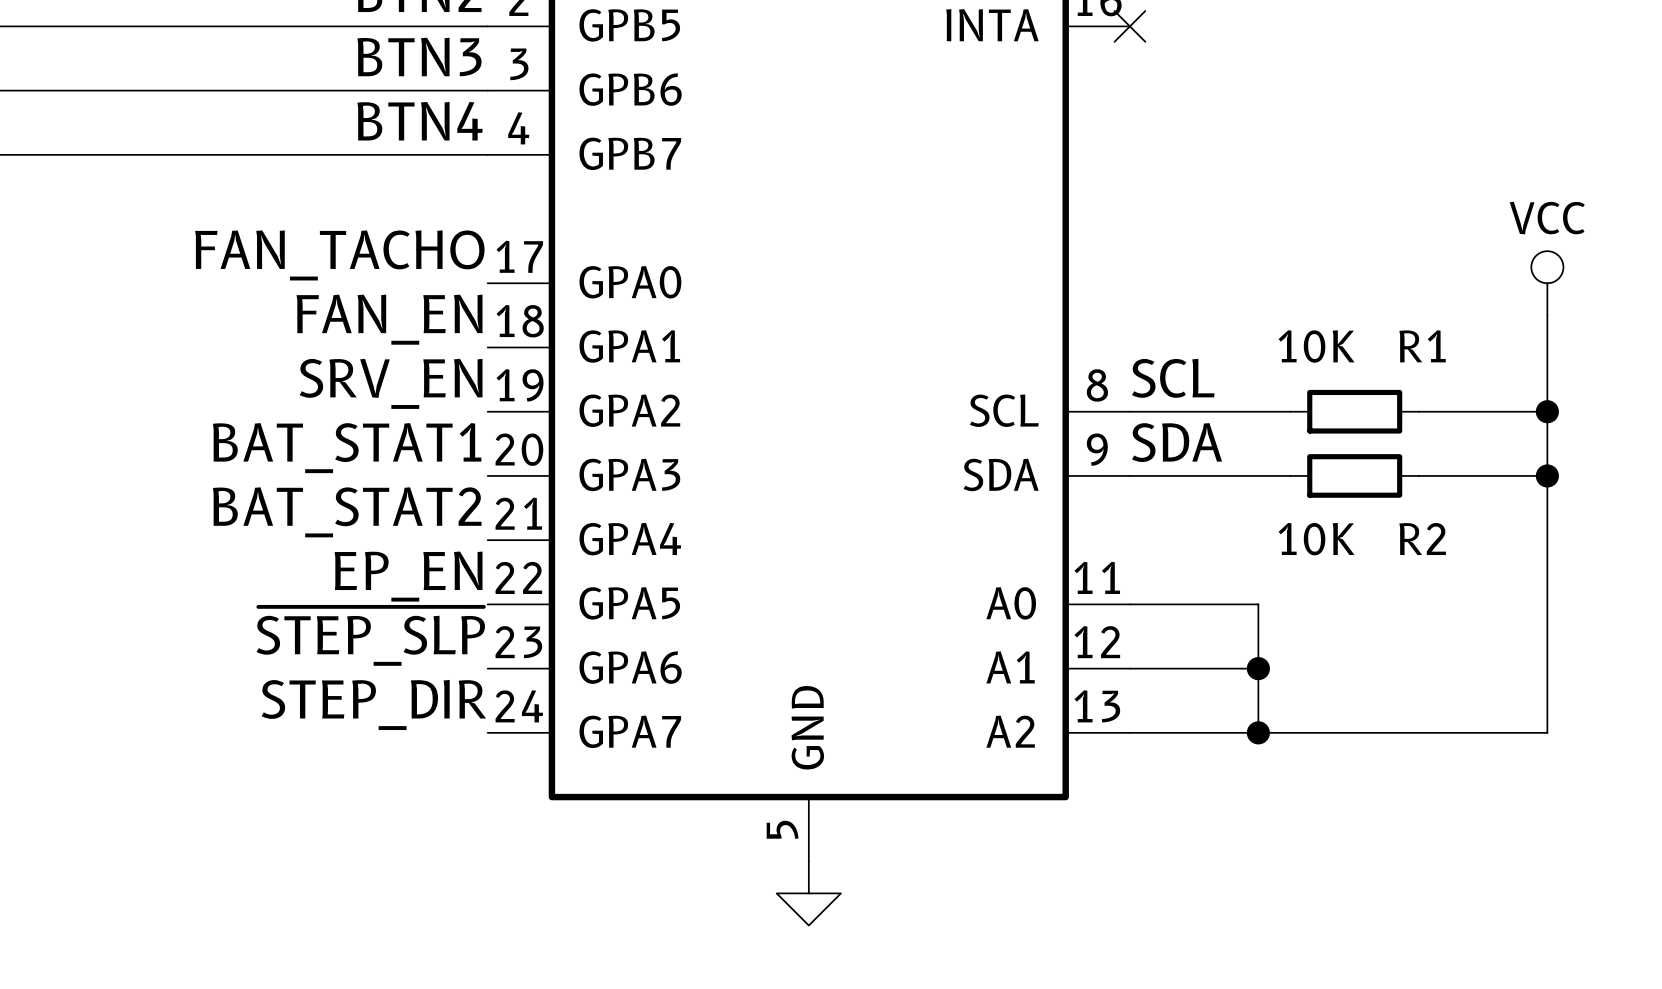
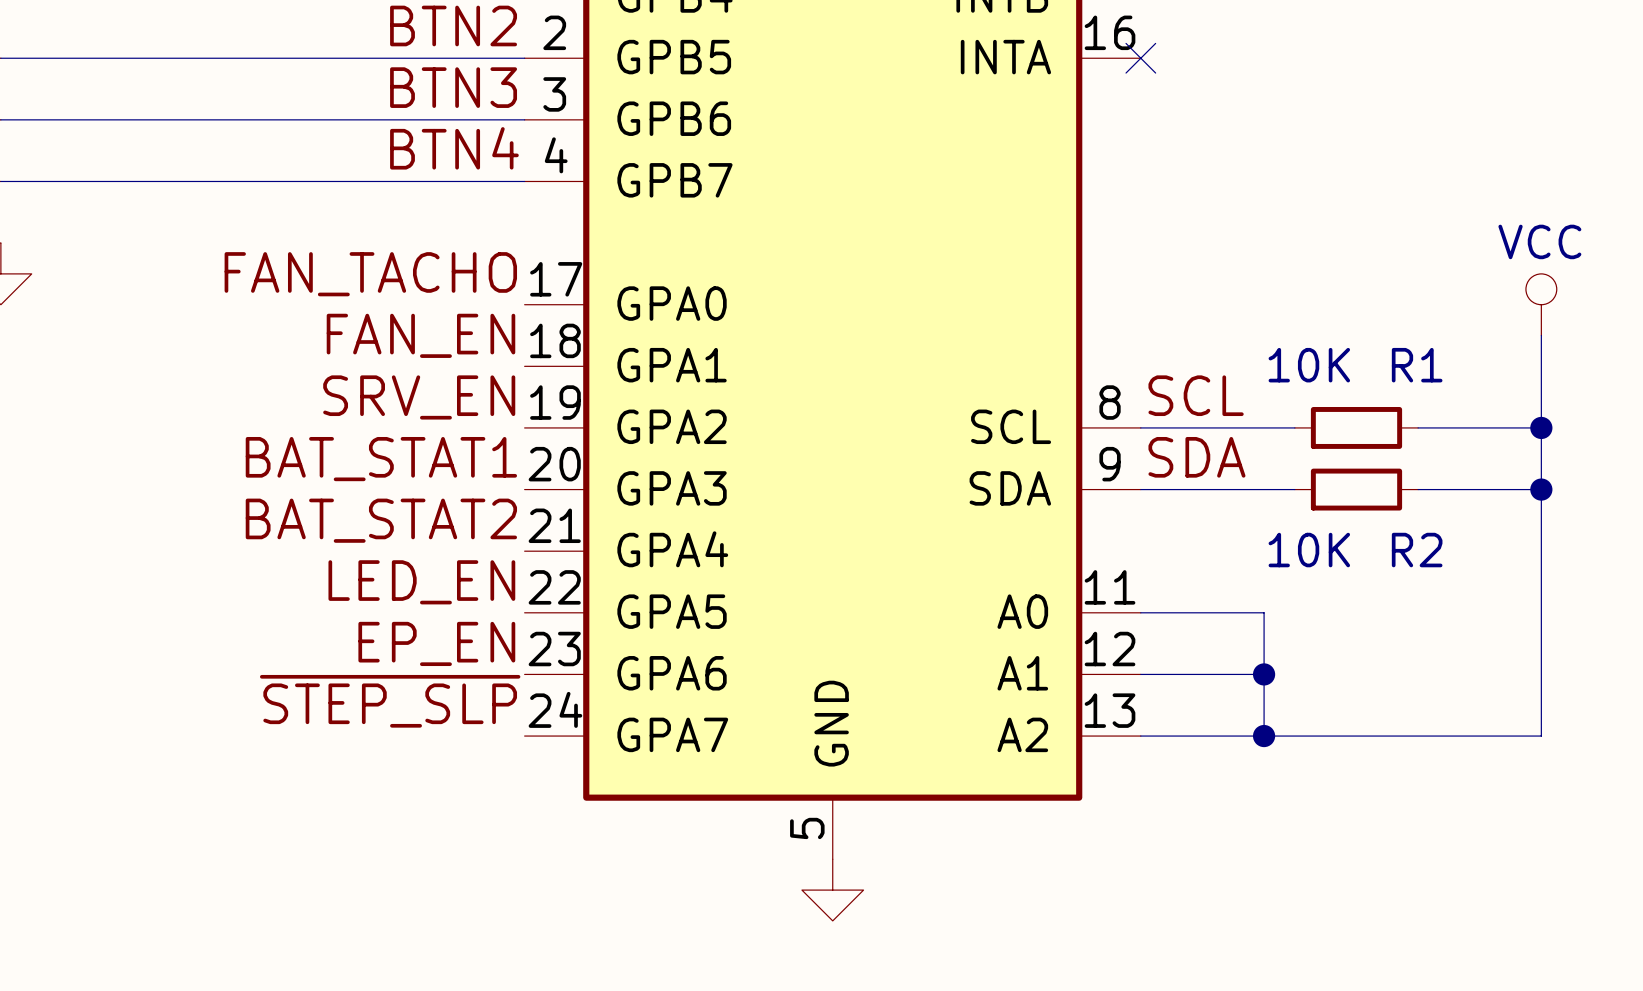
label: EP_EN (408, 576) -> LED_EN (421, 582)
label: ~{STEP_SLP} (370, 636) -> EP_EN (436, 643)
label: STEP_DIR (373, 704) -> ~{STEP_SLP} (390, 701)

